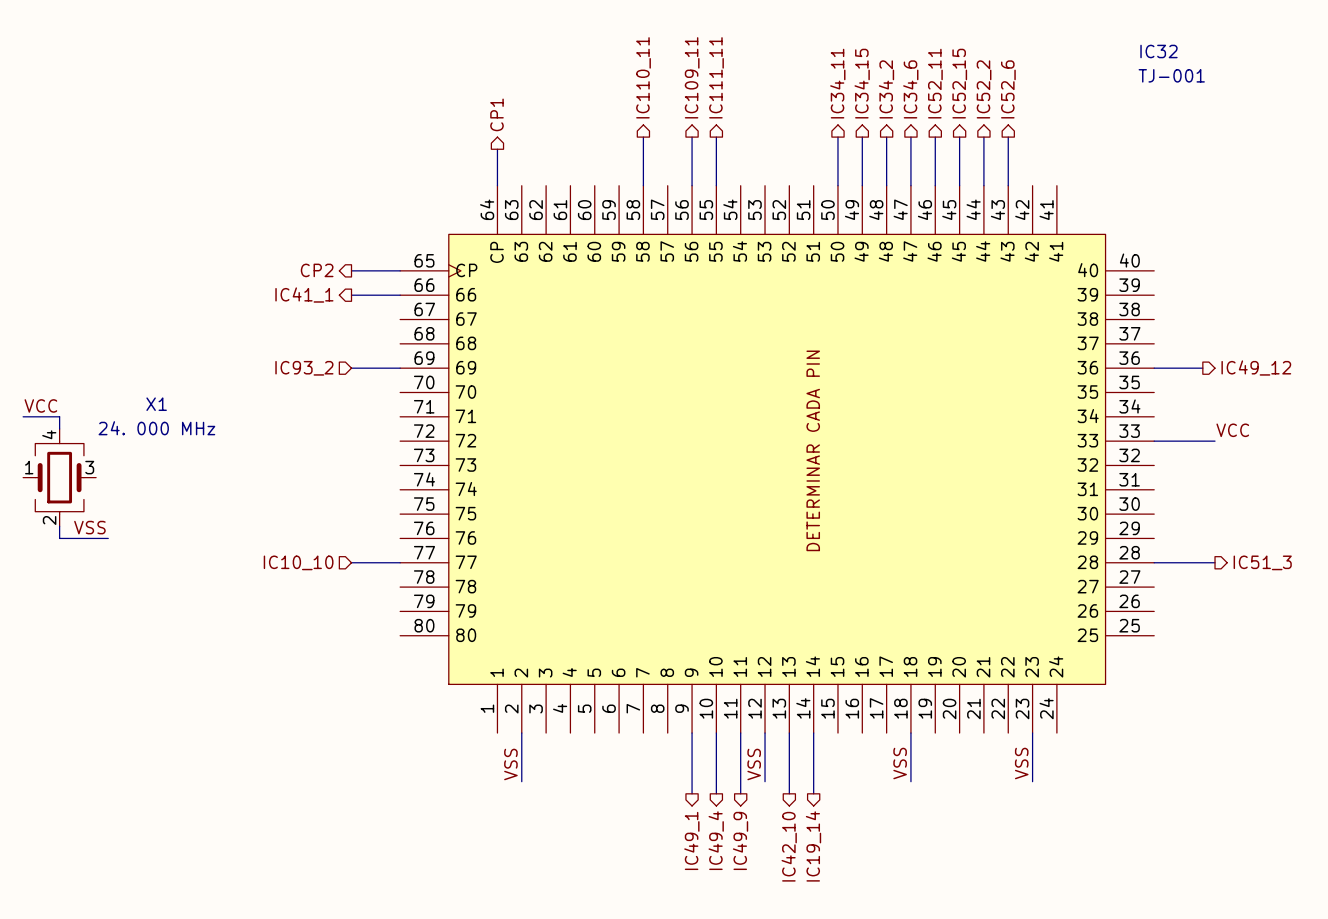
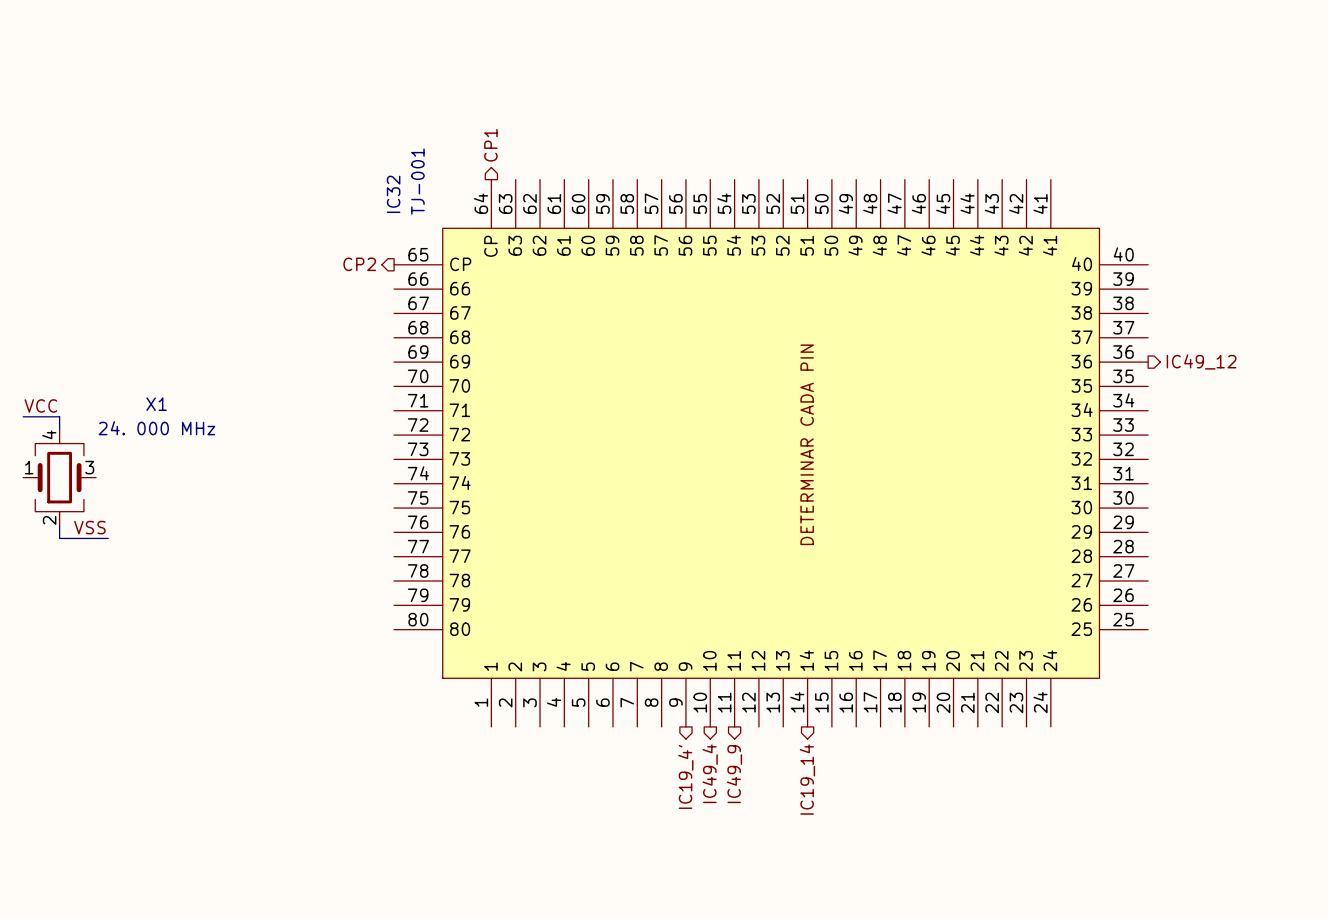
IC32 name position: IC32 (1158, 51) -> IC32 (393, 194)
IC32 value position: TJ-001 (1171, 75) -> TJ-001 (417, 181)
hierarchical label: IC110_11 (643, 77) -> none
hierarchical label: IC109_11 (692, 77) -> none
hierarchical label: IC111_11 (716, 77) -> none
hierarchical label: IC34_11 (837, 83) -> none
hierarchical label: IC34_15 (862, 83) -> none
hierarchical label: IC52_11 (935, 83) -> none
hierarchical label: IC52_15 (959, 83) -> none
hierarchical label: IC34_2 (886, 89) -> none
hierarchical label: IC34_6 (910, 89) -> none
hierarchical label: IC52_2 (984, 89) -> none
hierarchical label: IC52_6 (1008, 89) -> none
hierarchical label position: CP1 (496, 114) -> CP1 (490, 145)
wire: (643, 137) (643, 185) -> none
wire: (692, 137) (692, 185) -> none
wire: (716, 137) (716, 185) -> none
wire: (837, 137) (837, 185) -> none
wire: (862, 137) (862, 185) -> none
wire: (886, 137) (886, 185) -> none
wire: (910, 137) (910, 185) -> none
wire: (935, 137) (935, 185) -> none
wire: (959, 137) (959, 185) -> none
wire: (983, 137) (983, 185) -> none
wire: (1008, 137) (1008, 185) -> none
wire: (497, 149) (497, 185) -> none
IC32 symbol: [400, 185, 1155, 734] -> [394, 179, 1149, 727]
hierarchical label position: CP2 (317, 270) -> CP2 (359, 264)
wire: (351, 270) (400, 270) -> none
hierarchical label: IC41_1 (304, 295) -> none
wire: (351, 295) (400, 295) -> none
hierarchical label: IC93_2 (304, 368) -> none
wire: (351, 368) (400, 368) -> none
wire: (1154, 368) (1202, 368) -> none
hierarchical label position: IC49_12 (1256, 368) -> IC49_12 (1201, 361)
label: VCC (1232, 430) -> none
wire: (1154, 441) (1215, 441) -> none
hierarchical label: IC10_10 (298, 562) -> none
wire: (351, 562) (400, 562) -> none
wire: (1154, 562) (1215, 562) -> none
hierarchical label: IC51_3 (1262, 562) -> none
wire: (521, 733) (521, 781) -> none
wire: (692, 733) (692, 793) -> none
wire: (716, 733) (716, 793) -> none
wire: (740, 733) (740, 793) -> none
wire: (765, 733) (765, 781) -> none
wire: (789, 733) (789, 793) -> none
wire: (813, 733) (813, 793) -> none
wire: (910, 733) (910, 781) -> none
wire: (1032, 733) (1032, 781) -> none
label: VSS (900, 763) -> none
label: VSS (1021, 763) -> none
label: VSS (510, 764) -> none
label: VSS (754, 764) -> none
hierarchical label: IC49_1 (691, 840) -> IC19_4' (685, 776)
hierarchical label position: IC49_4 (716, 840) -> IC49_4 (710, 773)
hierarchical label position: IC49_9 (740, 840) -> IC49_9 (734, 774)
hierarchical label: IC42_10 (789, 846) -> none
hierarchical label position: IC19_14 (813, 846) -> IC19_14 (807, 779)

